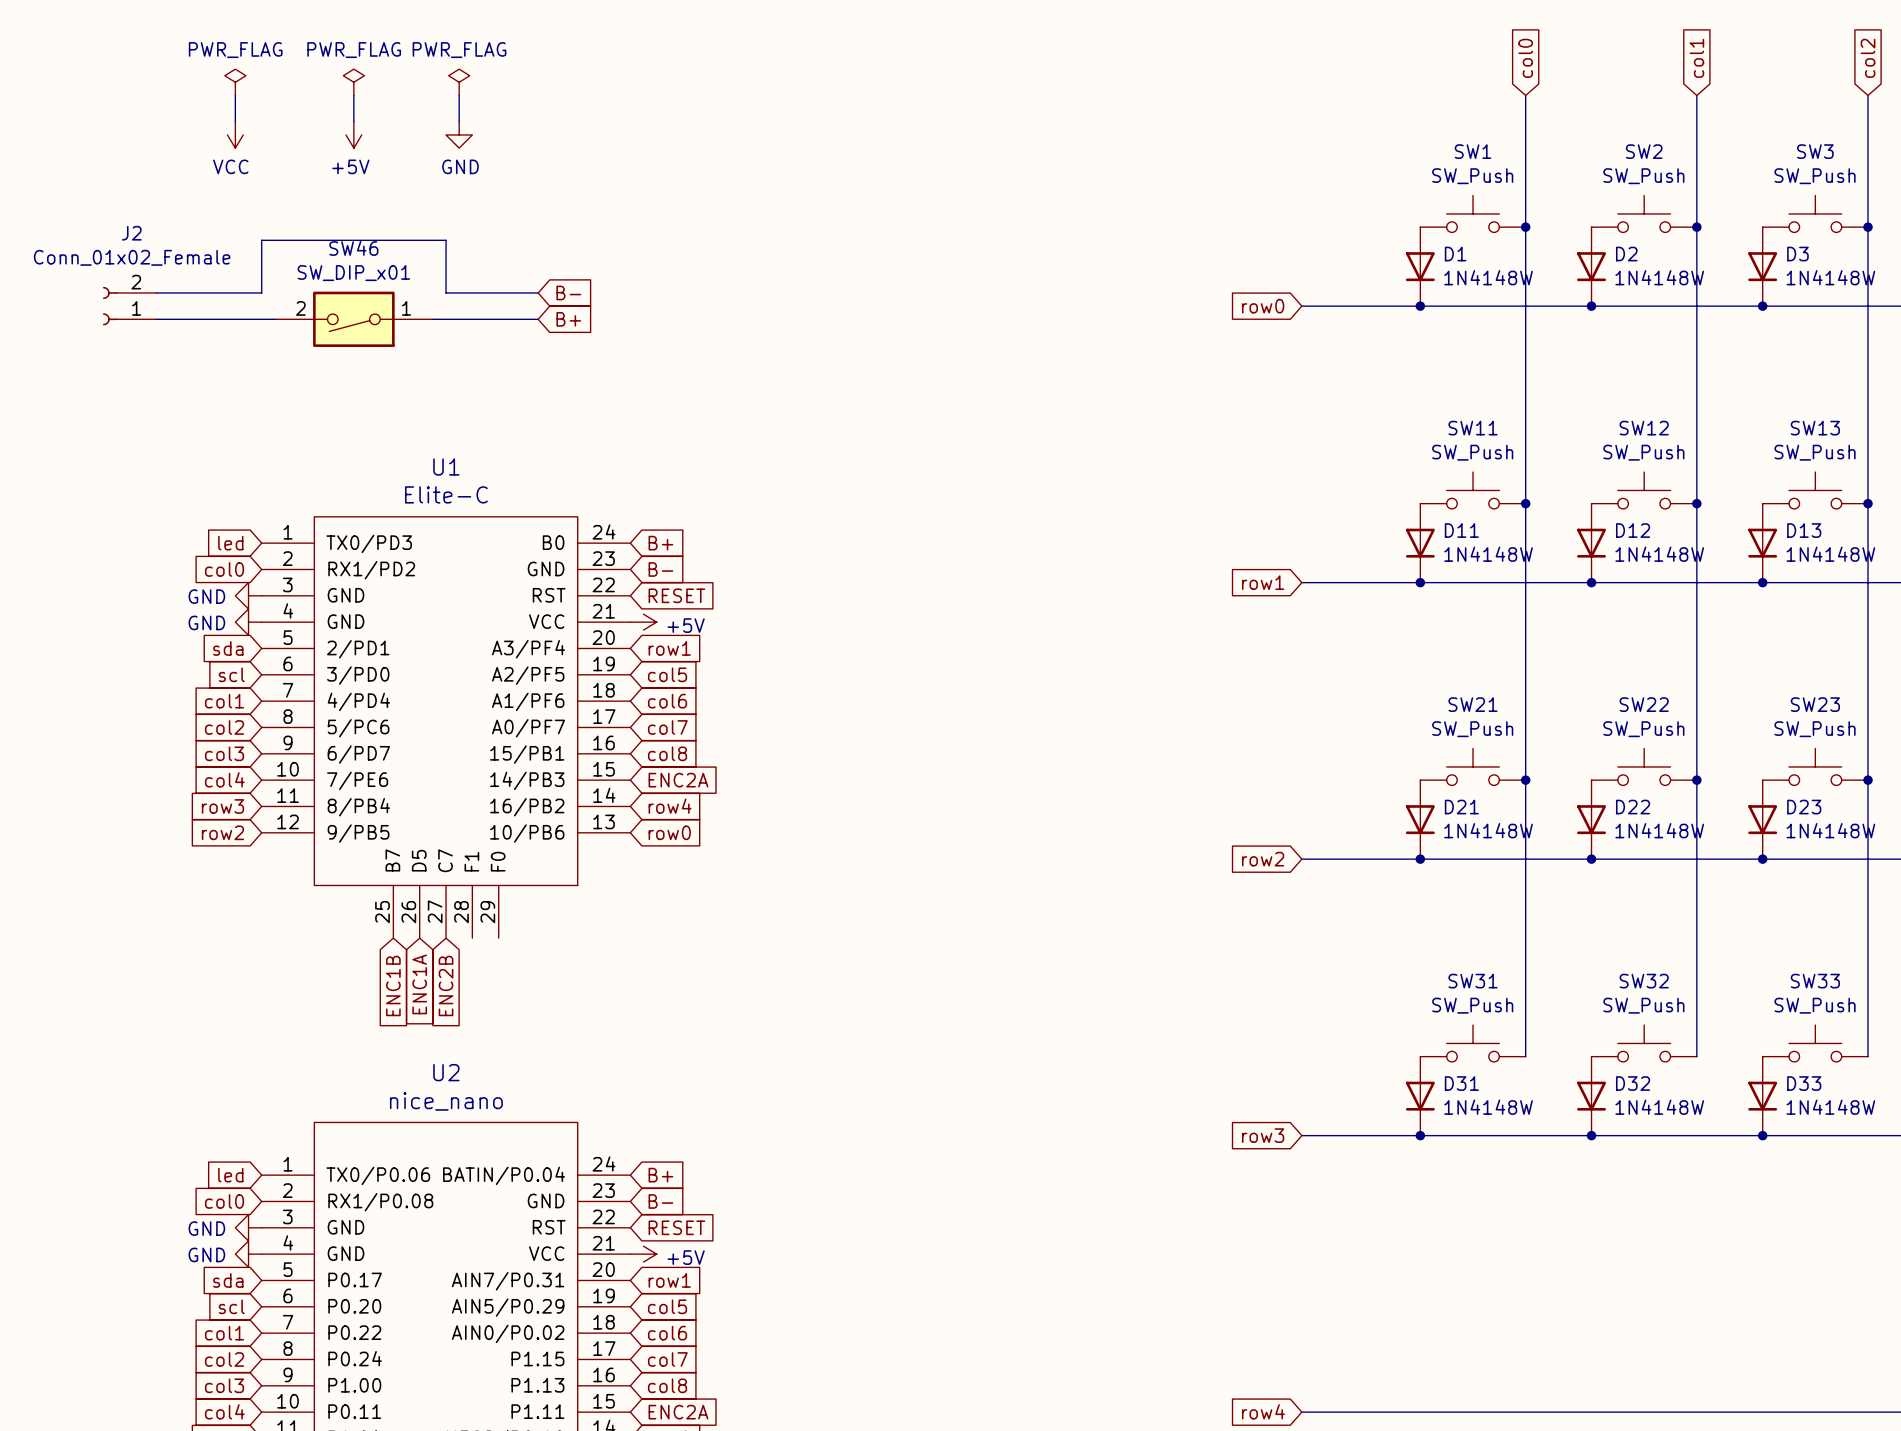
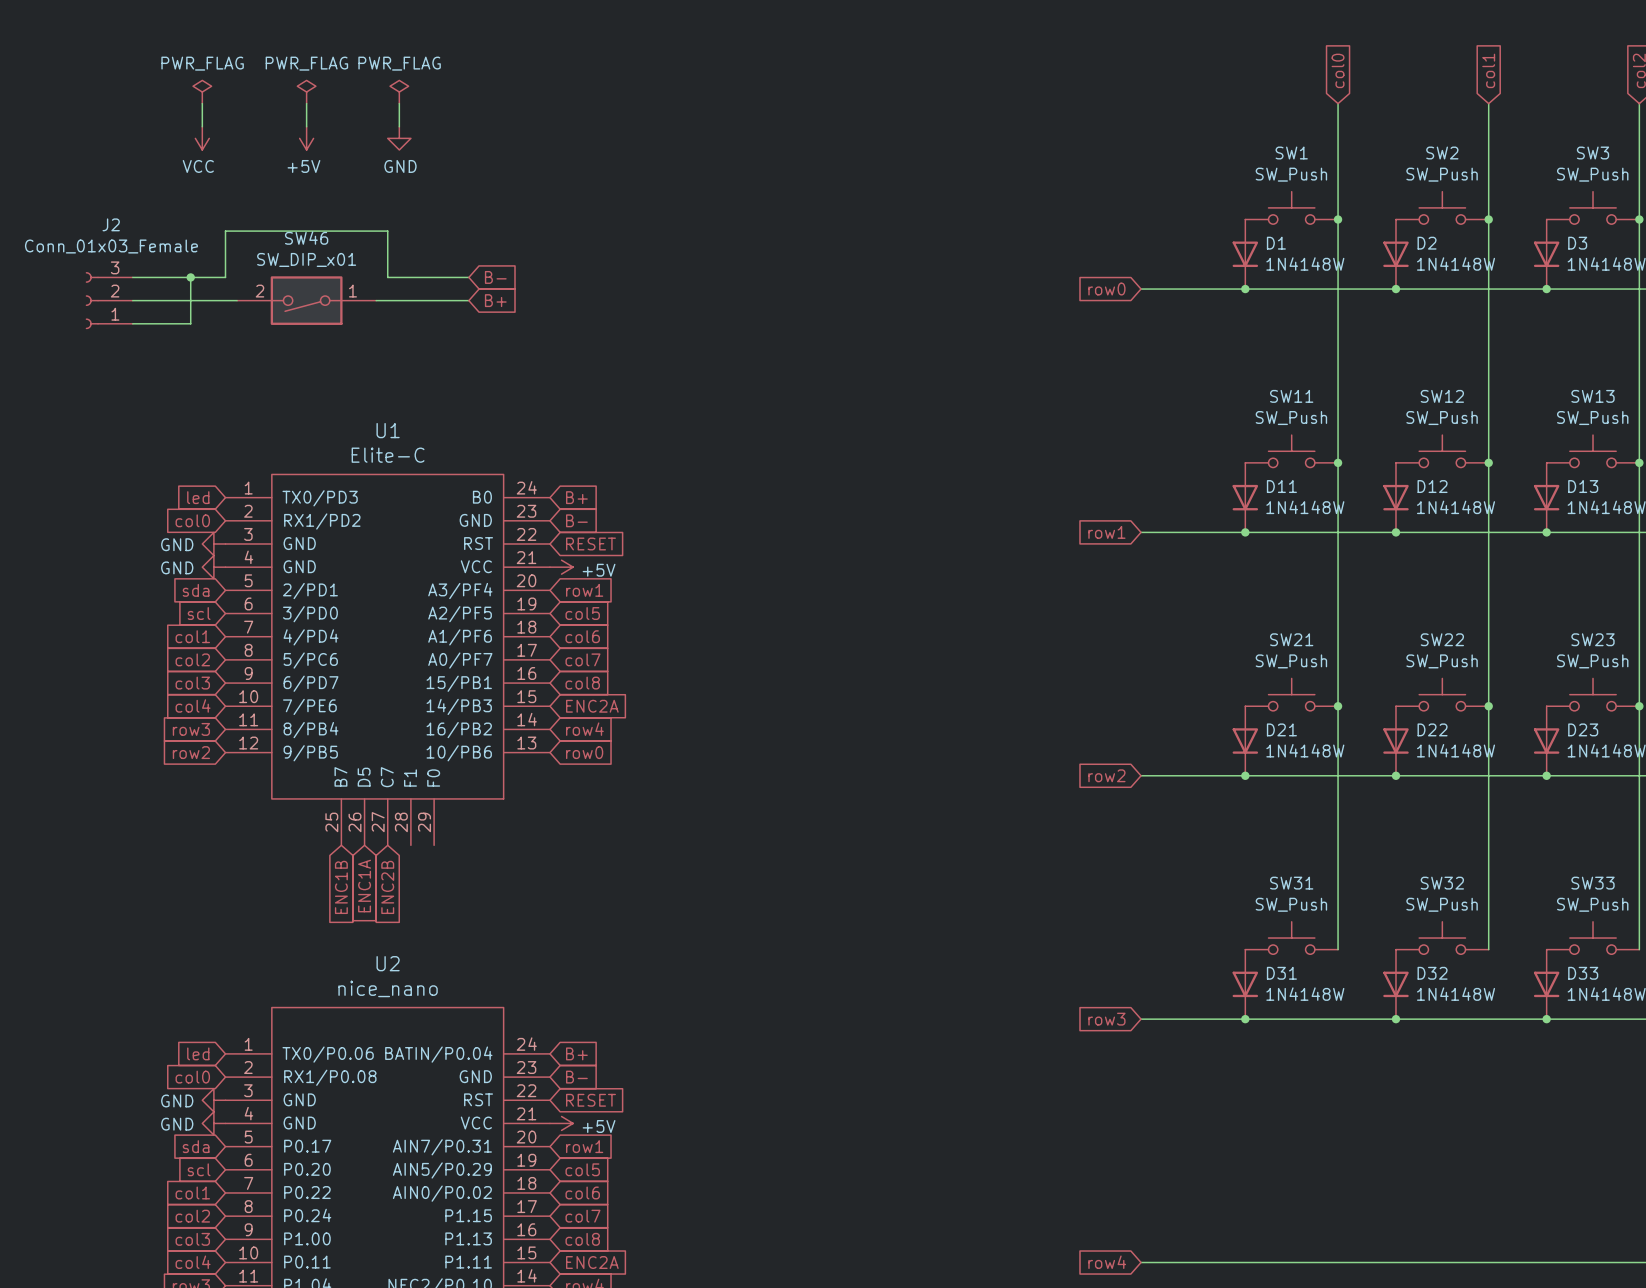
J2 value: Conn_01x02_Female (132, 257) -> Conn_01x03_Female (111, 246)
J2 symbol: [102, 286, 157, 326] -> [85, 272, 133, 330]
wire: none -> (190, 277) (190, 323) (132, 323)
junction: none -> (190, 277)

